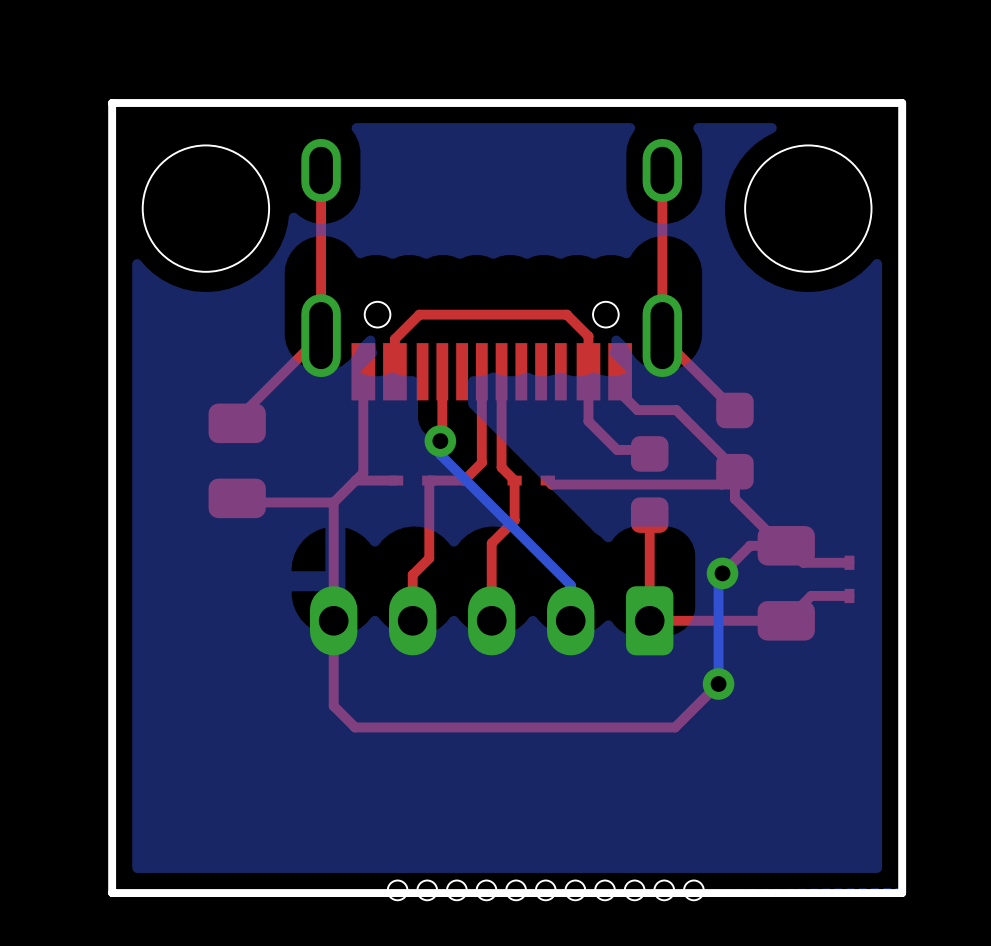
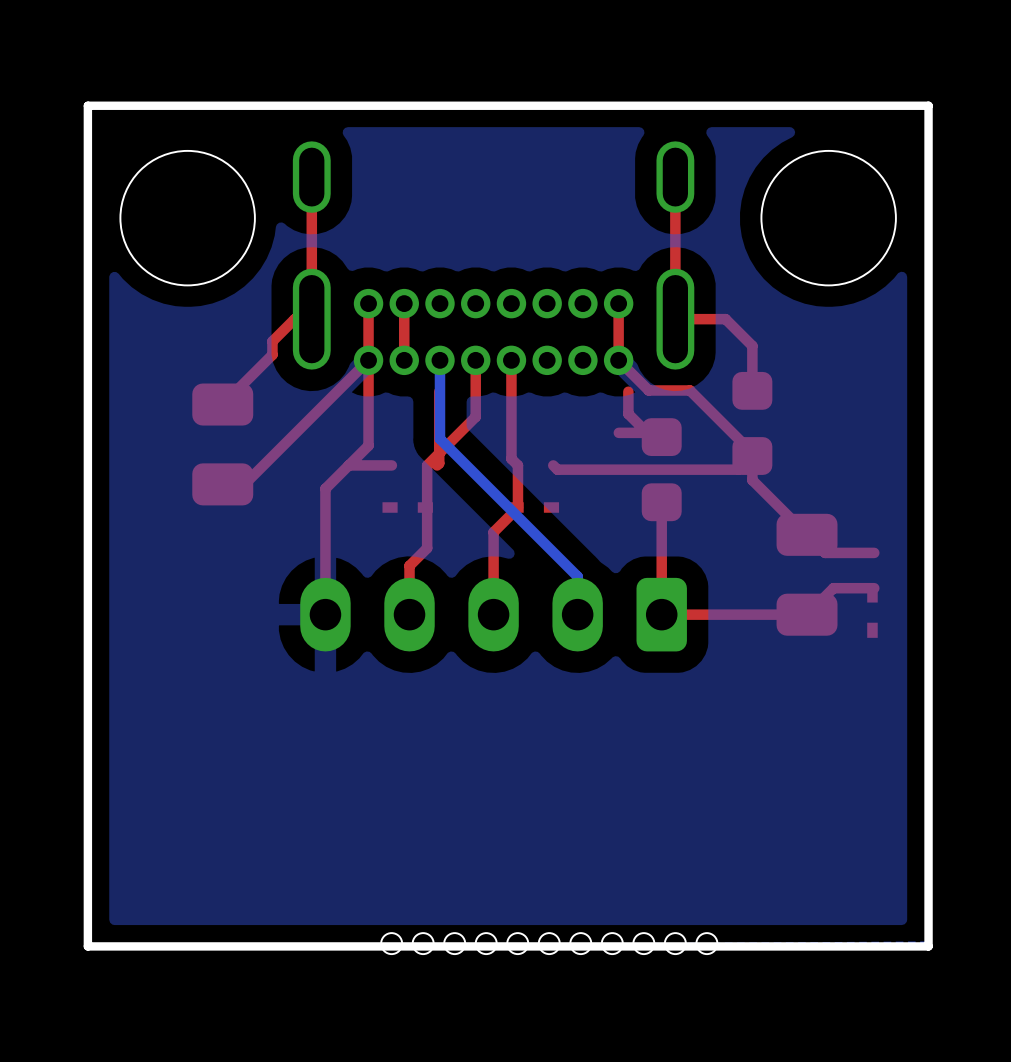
part footprint: [301, 138, 683, 401] -> [292, 141, 695, 376]
top track: (321, 170) (321, 335) (237, 419) (237, 423) -> (311, 177) (311, 319) (294, 319) (272, 341) (272, 354) (222, 404)
top track: (662, 170) (662, 337) (734, 410) -> none
top track: none -> (675, 177) (675, 319) (725, 319) (752, 345) (752, 382)
top track: none -> (368, 303) (368, 445) (325, 488) (325, 614)
top track: none -> (404, 303) (404, 360)
top track: none -> (618, 303) (618, 360) (648, 390) (690, 390) (742, 443) (748, 443)
top track: none -> (368, 360) (244, 484) (222, 484)
bottom track: none -> (439, 360) (439, 438) (577, 576) (577, 614)
top track: none -> (475, 360) (475, 416) (427, 465) (427, 548) (409, 565) (409, 614)
top track: none -> (511, 360) (511, 458) (517, 465) (517, 507) (493, 532) (493, 614)
top track: (363, 371) (363, 472) (333, 502) -> none
top track: (394, 371) (394, 339) (419, 314) (566, 314) (588, 336) (588, 421) (617, 449) (649, 449) -> none
top track: (481, 371) (481, 462) (464, 480) (429, 480) (429, 558) (412, 574) (412, 620) -> none
top track: (501, 371) (501, 467) (514, 480) (514, 520) (491, 543) (491, 620) -> none
top track: (651, 410) (676, 410) (726, 459) (730, 459) -> none
bottom track: (440, 441) (440, 454) (570, 585) (570, 620) -> none
via: (440, 441) -> none
top track: none -> (553, 465) (557, 469) (738, 469) (752, 456) (752, 480) (825, 552) (874, 552)
part position: (734, 441) -> (752, 423)
part position: (237, 460) -> (222, 444)
top track: (396, 480) (355, 480) -> (391, 465) (348, 465)
top track: (547, 480) (551, 484) (722, 484) (734, 471) (734, 498) (781, 545) -> none
part position: (649, 484) -> (661, 469)
top track: (257, 498) (237, 498) (241, 502) (333, 502) -> none
top track: (333, 502) (333, 706) (355, 727) (675, 727) (718, 684) -> none
top track: (649, 511) (649, 620) (786, 620) (811, 595) (849, 595) -> (661, 498) (661, 614) (806, 614) (833, 588) (874, 588)
top track: (849, 562) (803, 562) (786, 545) (750, 545) (722, 573) -> none
bottom track: (722, 573) (718, 577) (718, 684) -> none
via: (722, 573) -> none
part position: (786, 583) -> (807, 574)
part position: (491, 620) -> (493, 614)
via: (718, 684) -> none

